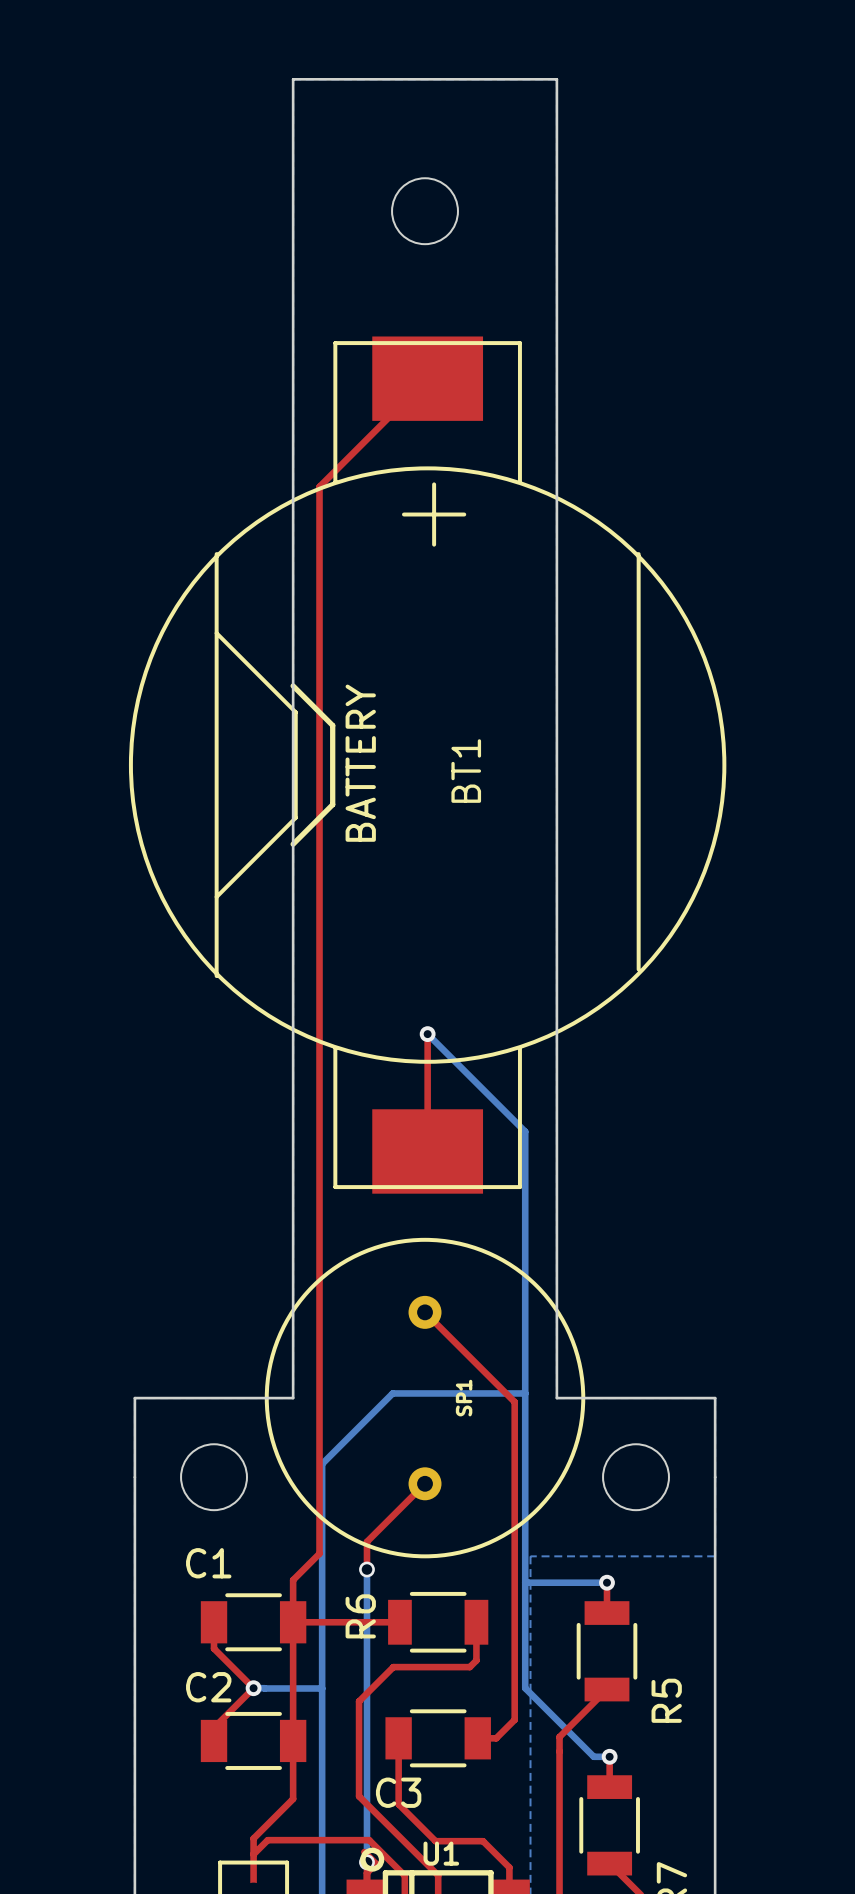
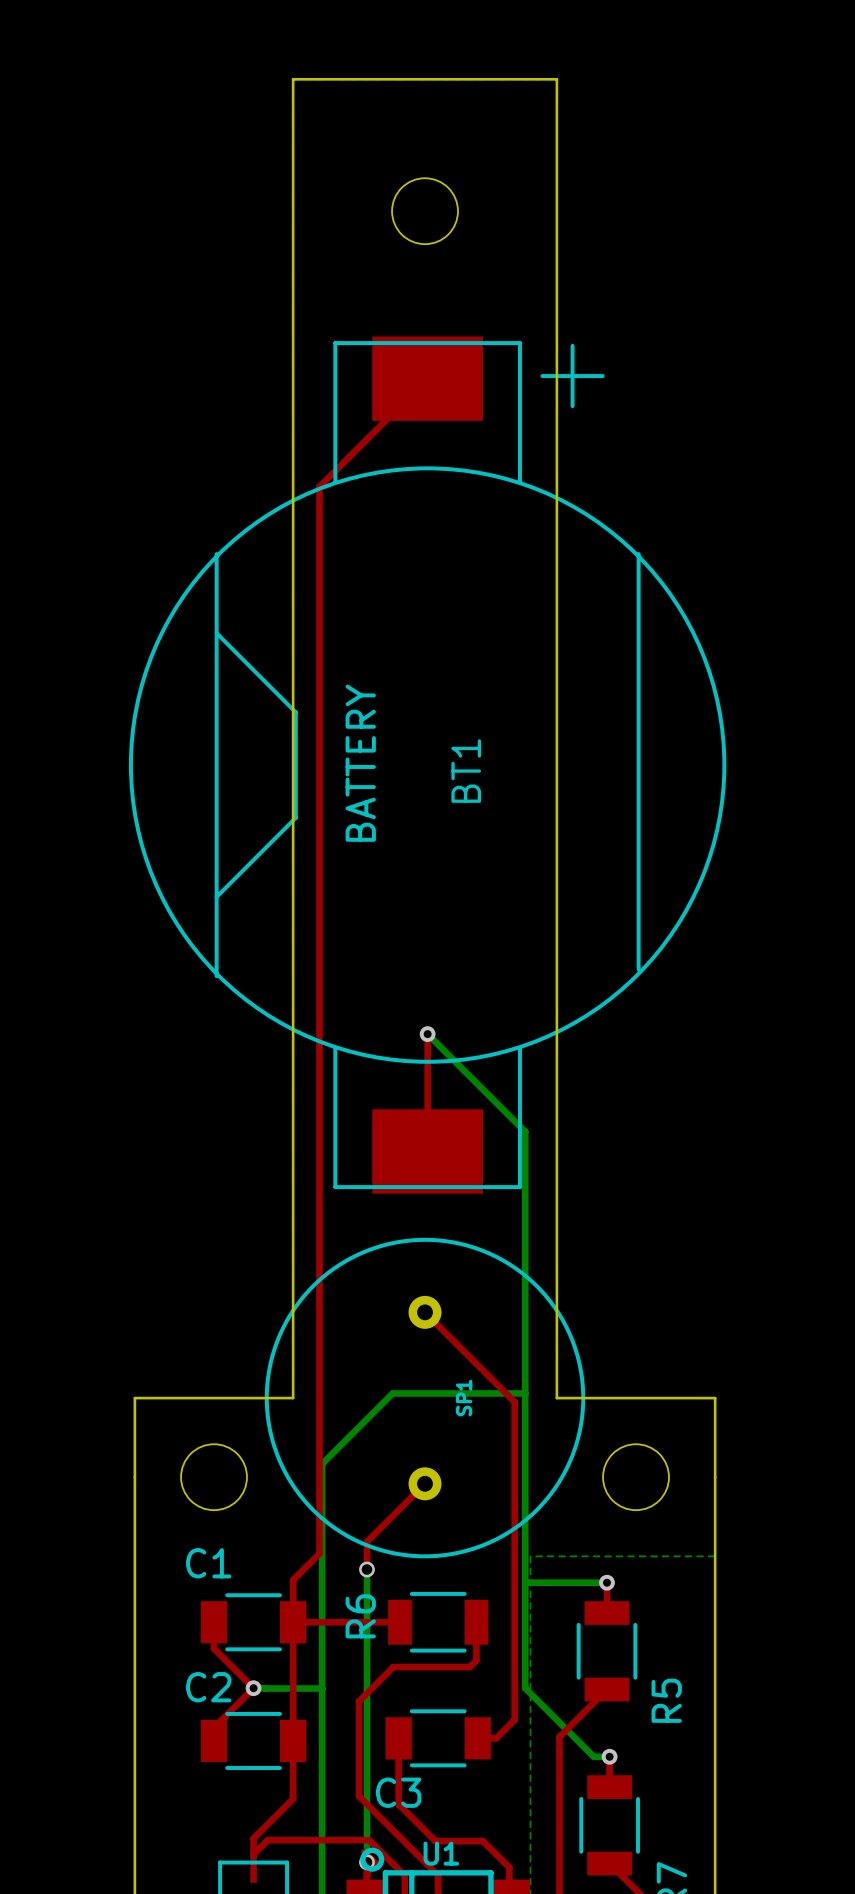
BT1 text position: + (434, 514) -> + (572, 376)
line: (293, 685) (332, 725) (332, 804) (293, 844) -> none

